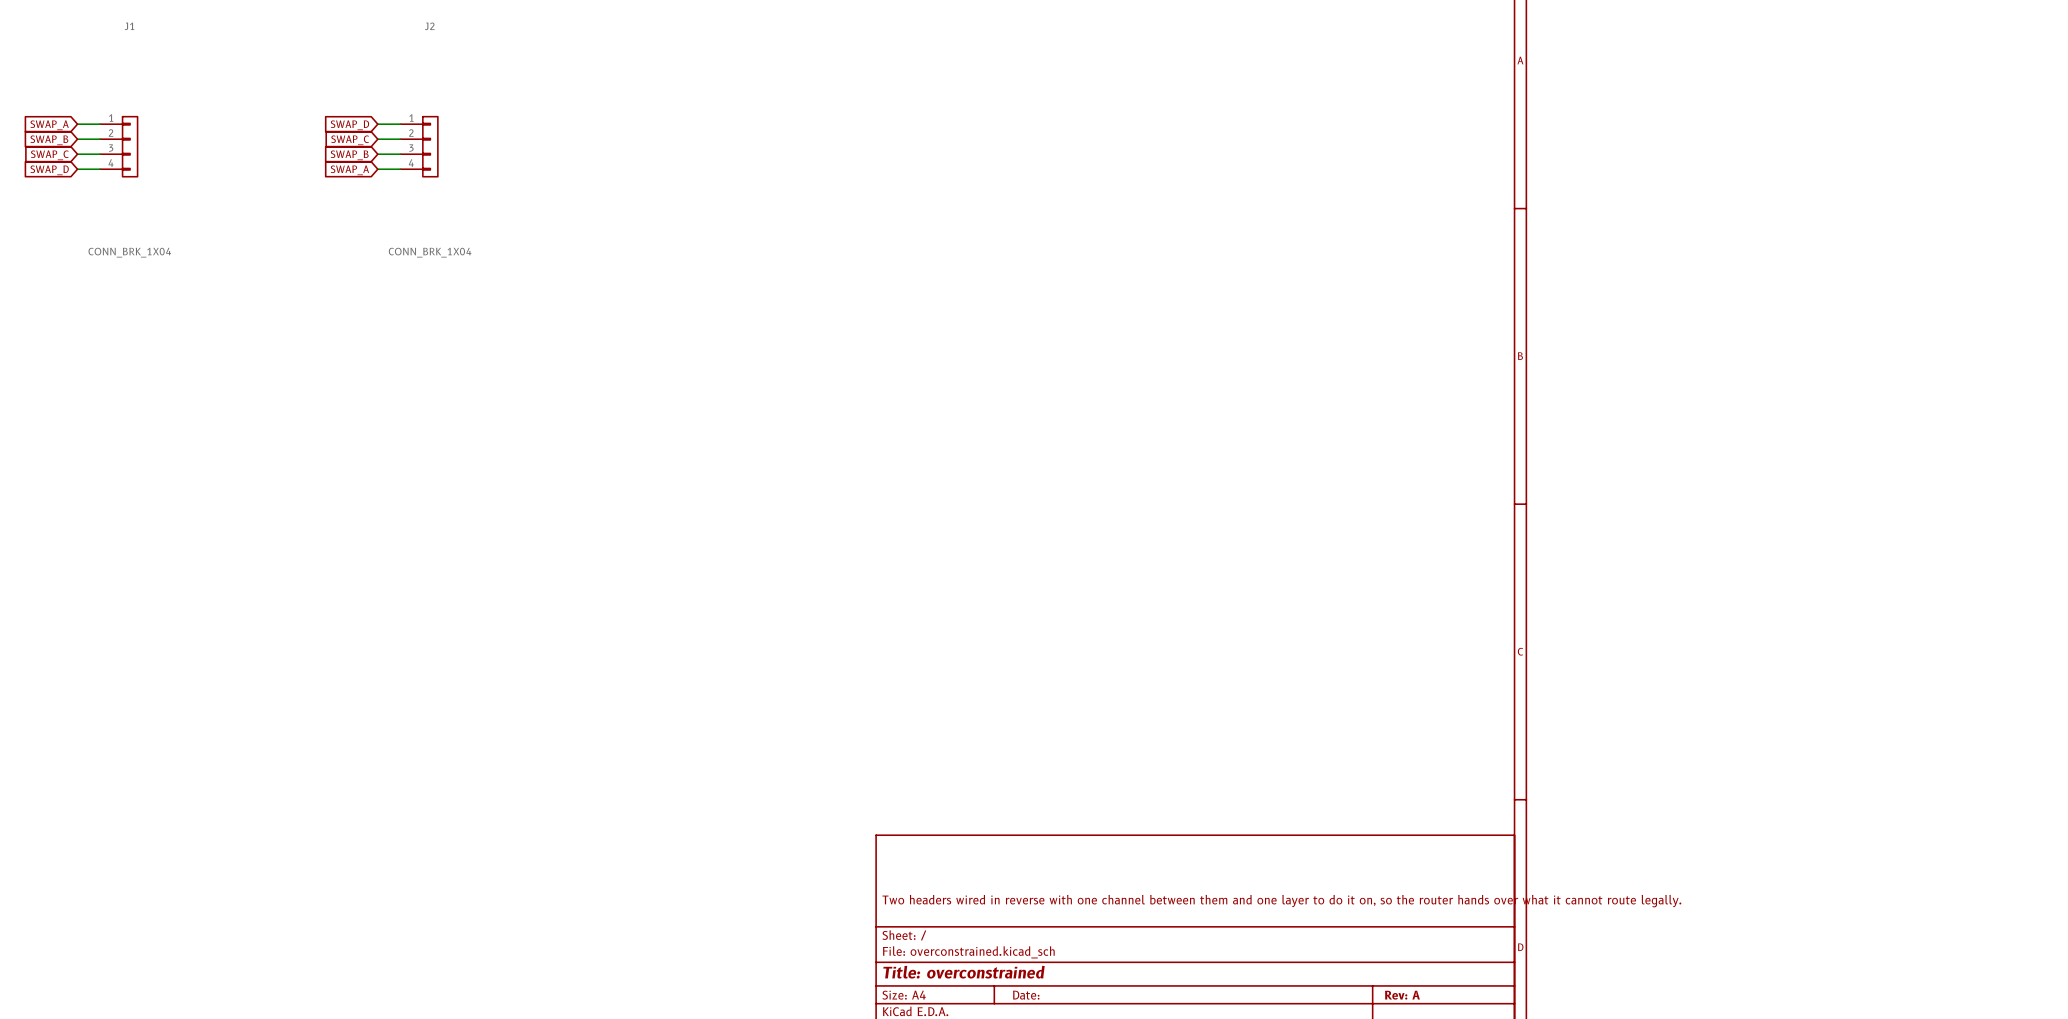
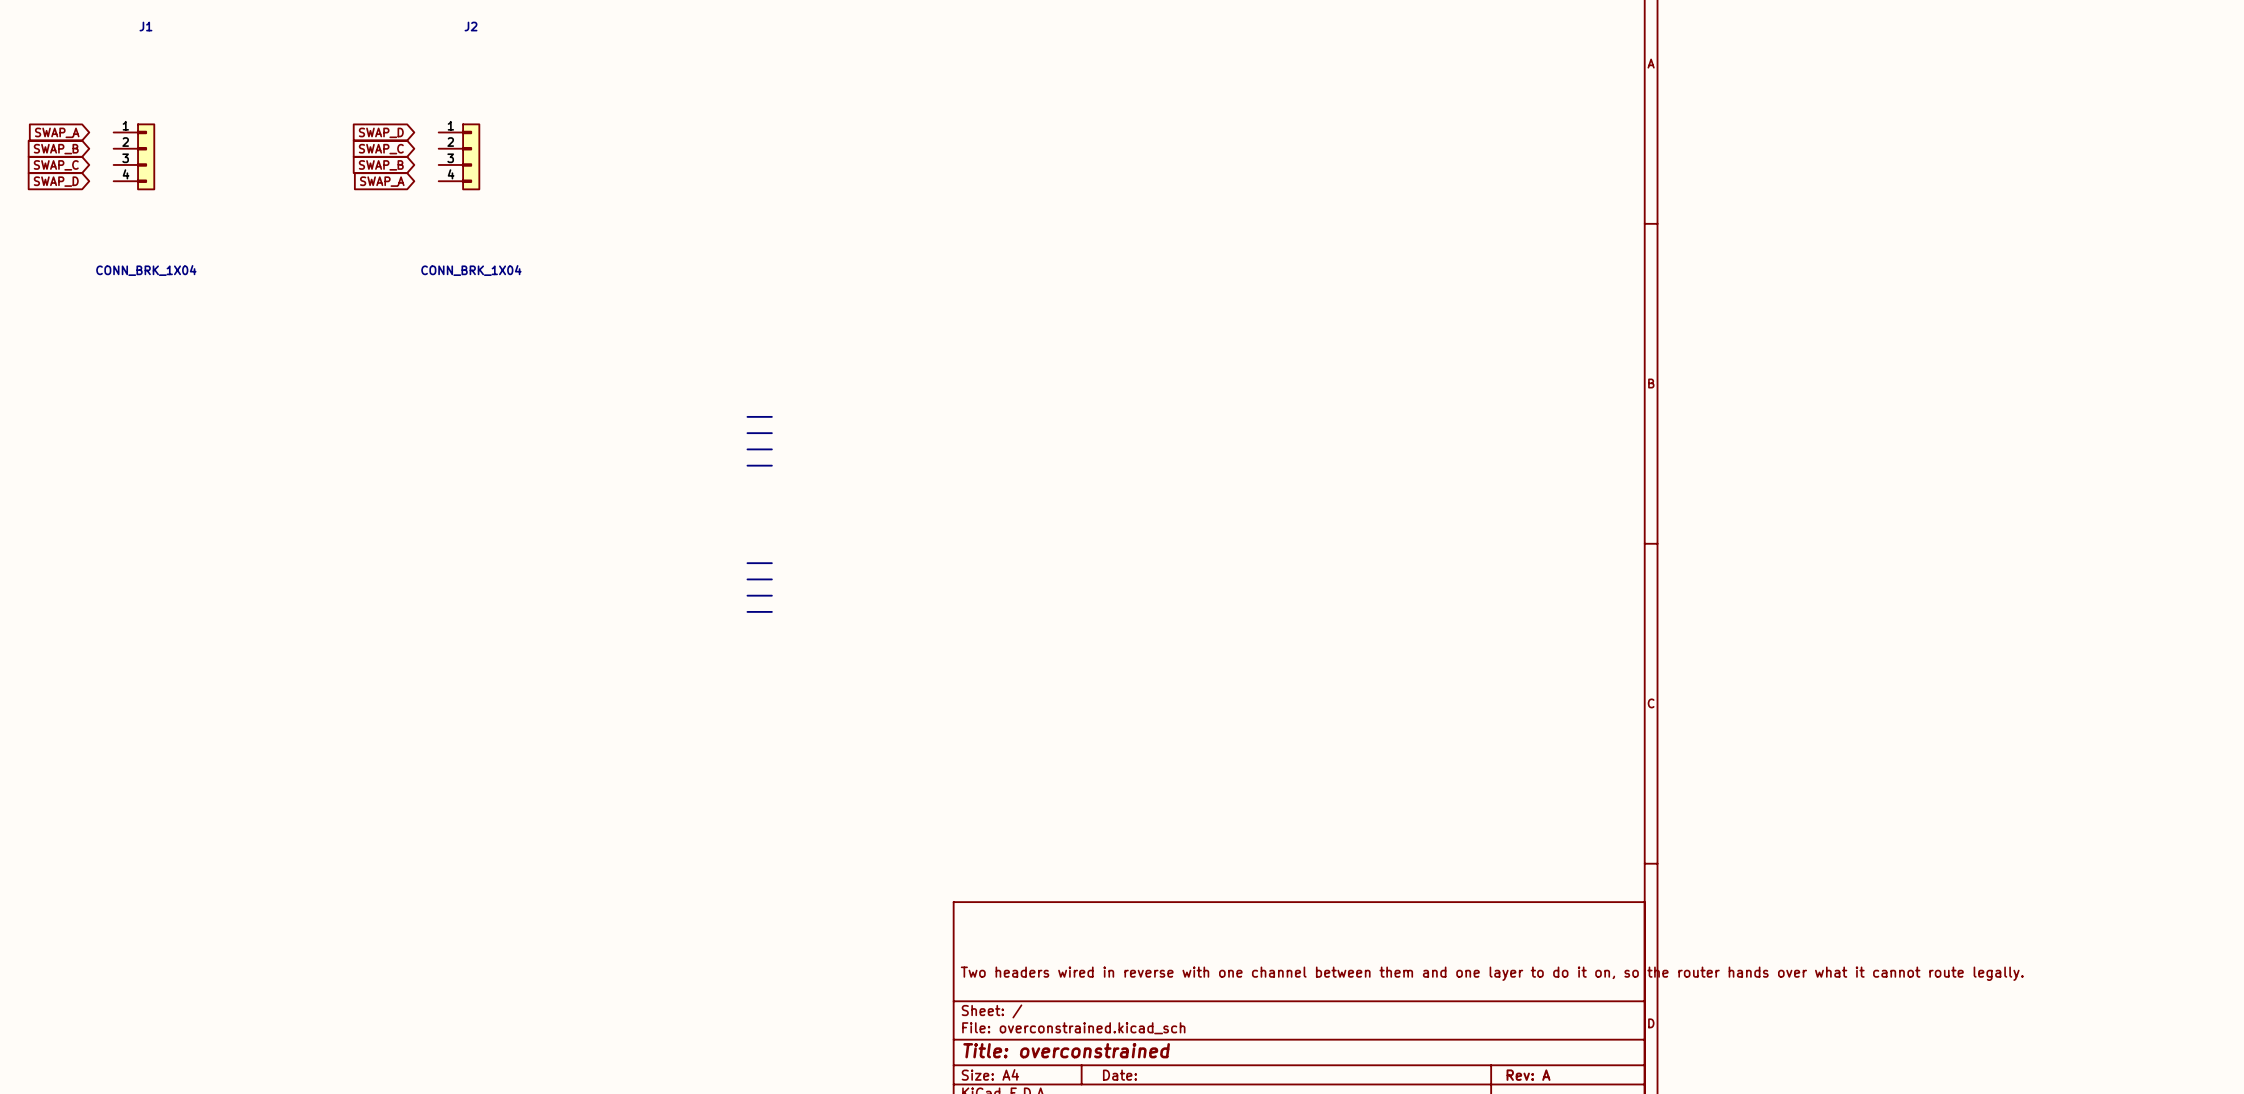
wire: (77, 124) (100, 124) -> none
wire: (377, 124) (400, 124) -> none
wire: (77, 139) (100, 139) -> none
wire: (377, 139) (400, 139) -> none
wire: (77, 154) (100, 154) -> none
wire: (377, 154) (400, 154) -> none
wire: (77, 169) (100, 169) -> none
wire: (377, 169) (400, 169) -> none
wire: none -> (747, 416) (771, 416)
wire: none -> (747, 433) (771, 433)
wire: none -> (747, 449) (771, 449)
wire: none -> (747, 465) (771, 465)
wire: none -> (747, 563) (771, 563)
wire: none -> (747, 579) (771, 579)
wire: none -> (747, 595) (771, 595)
wire: none -> (747, 611) (771, 611)

